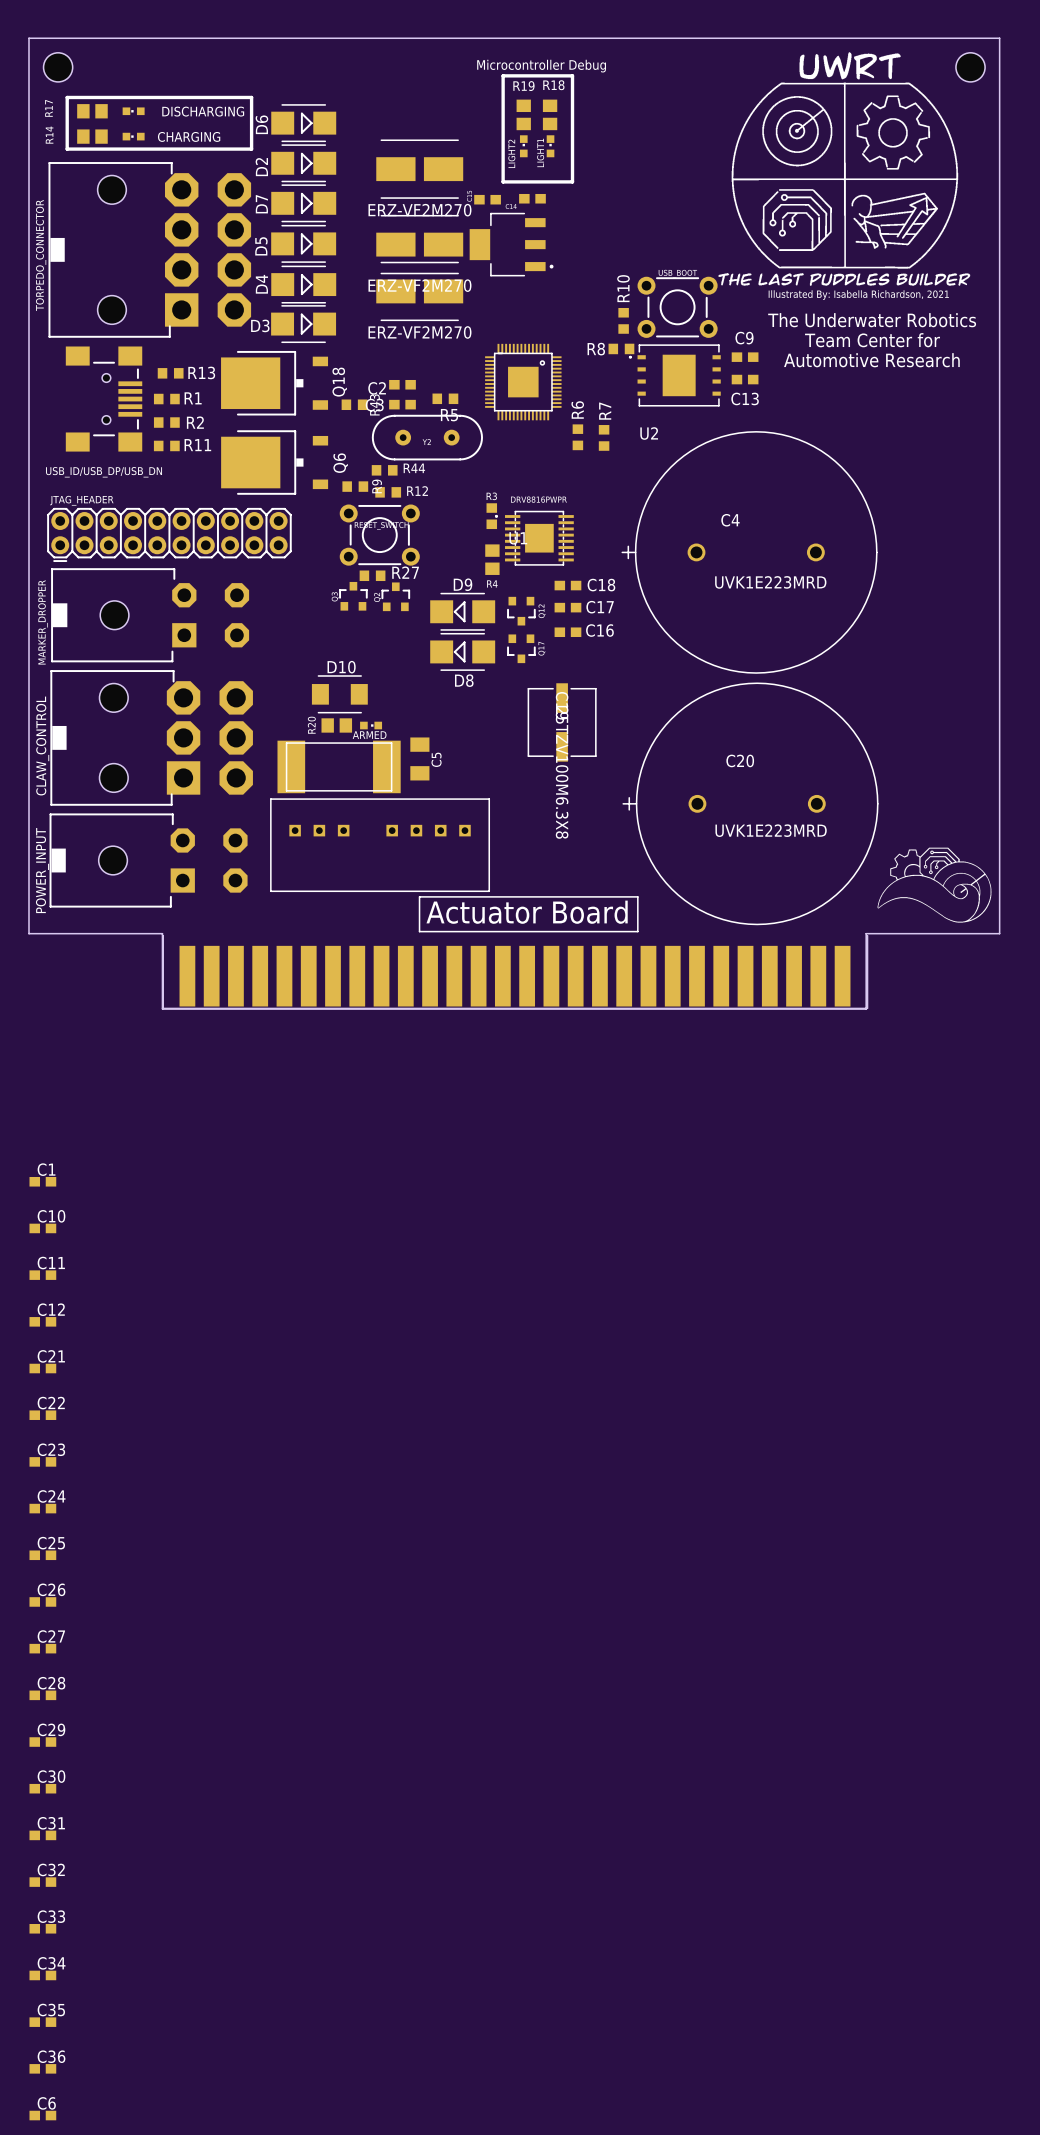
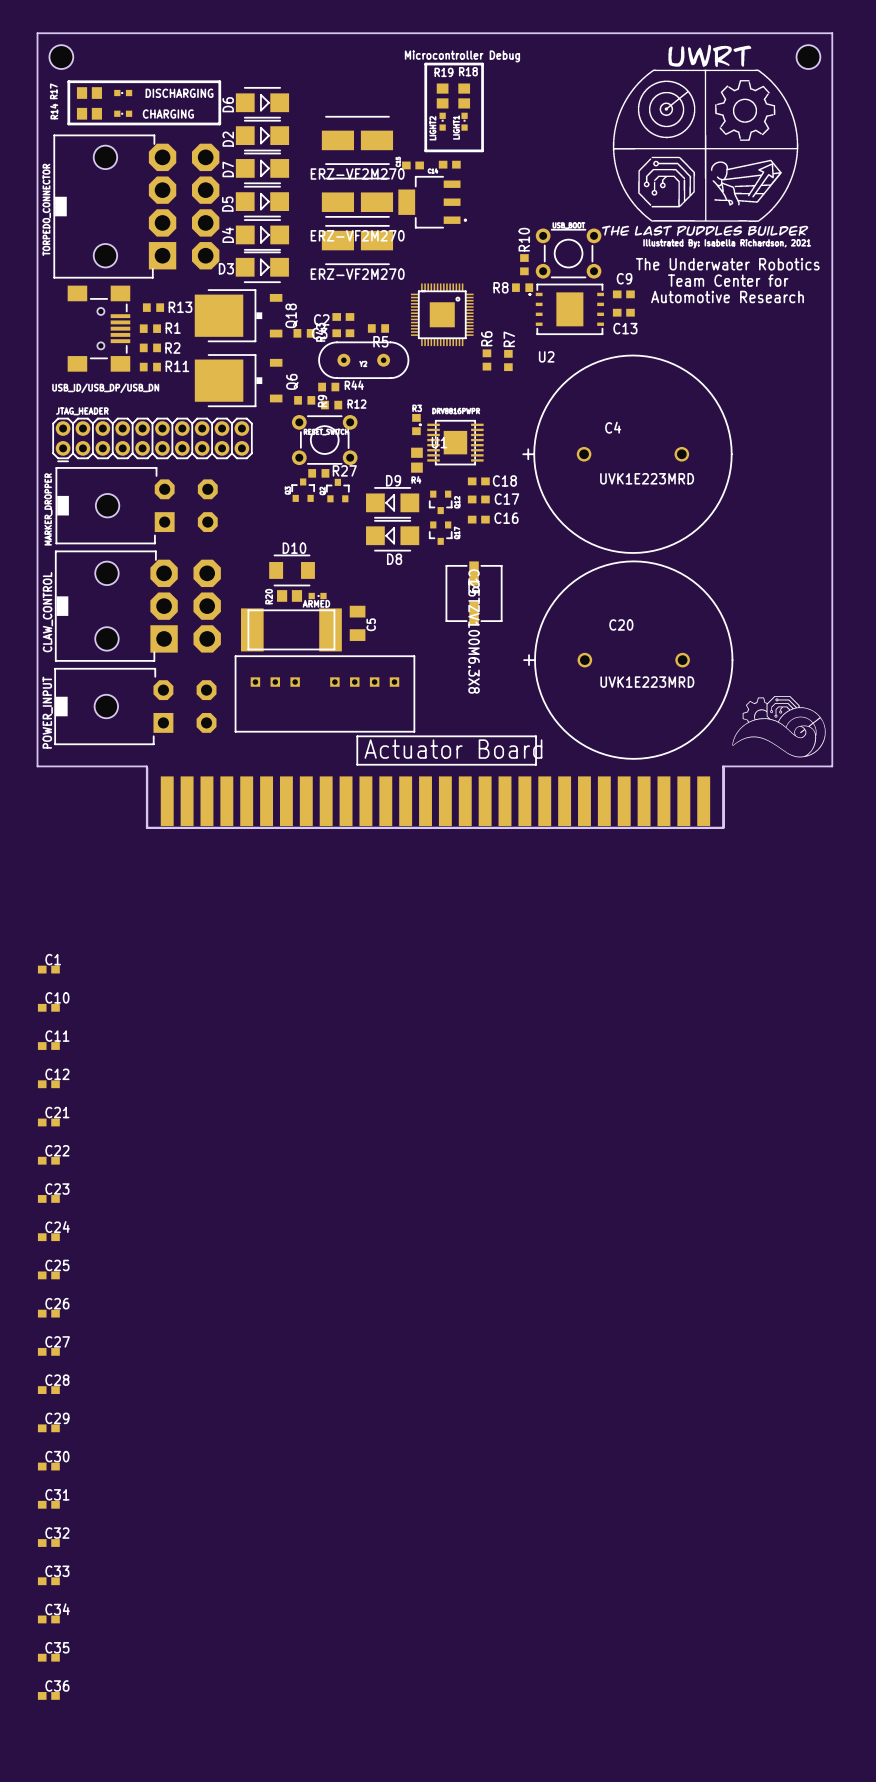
C6: (42, 2115) -> none

